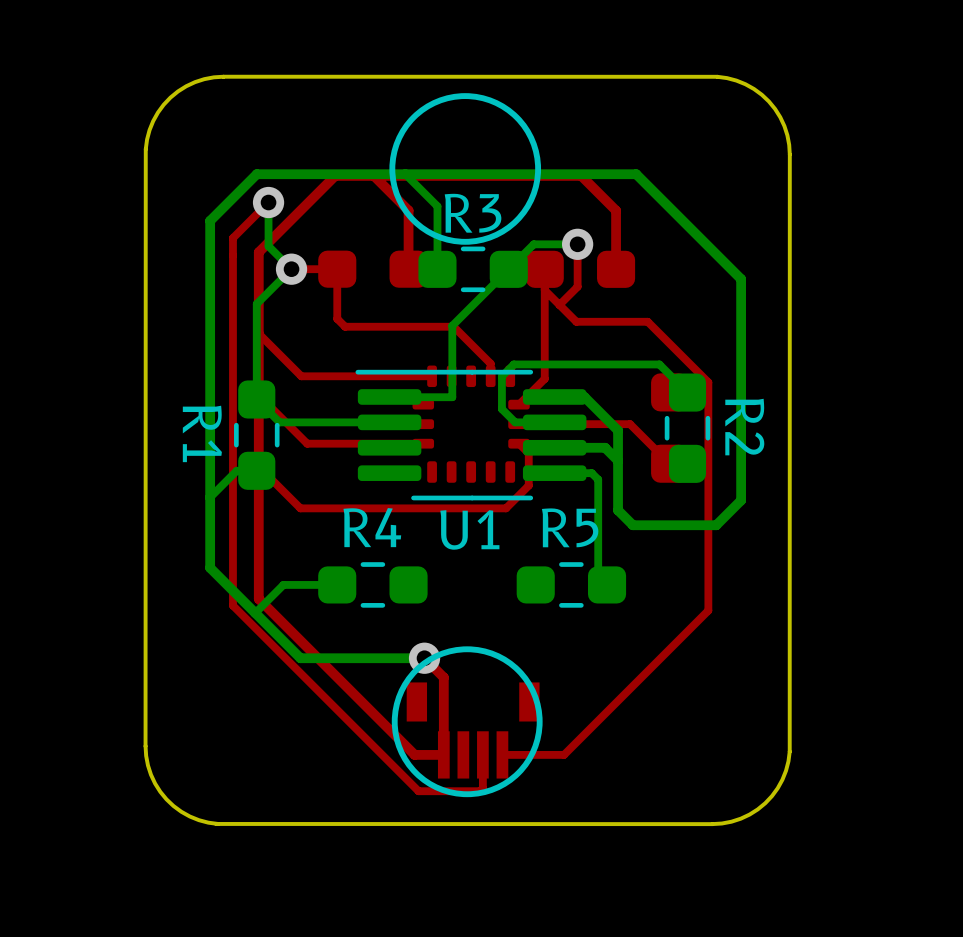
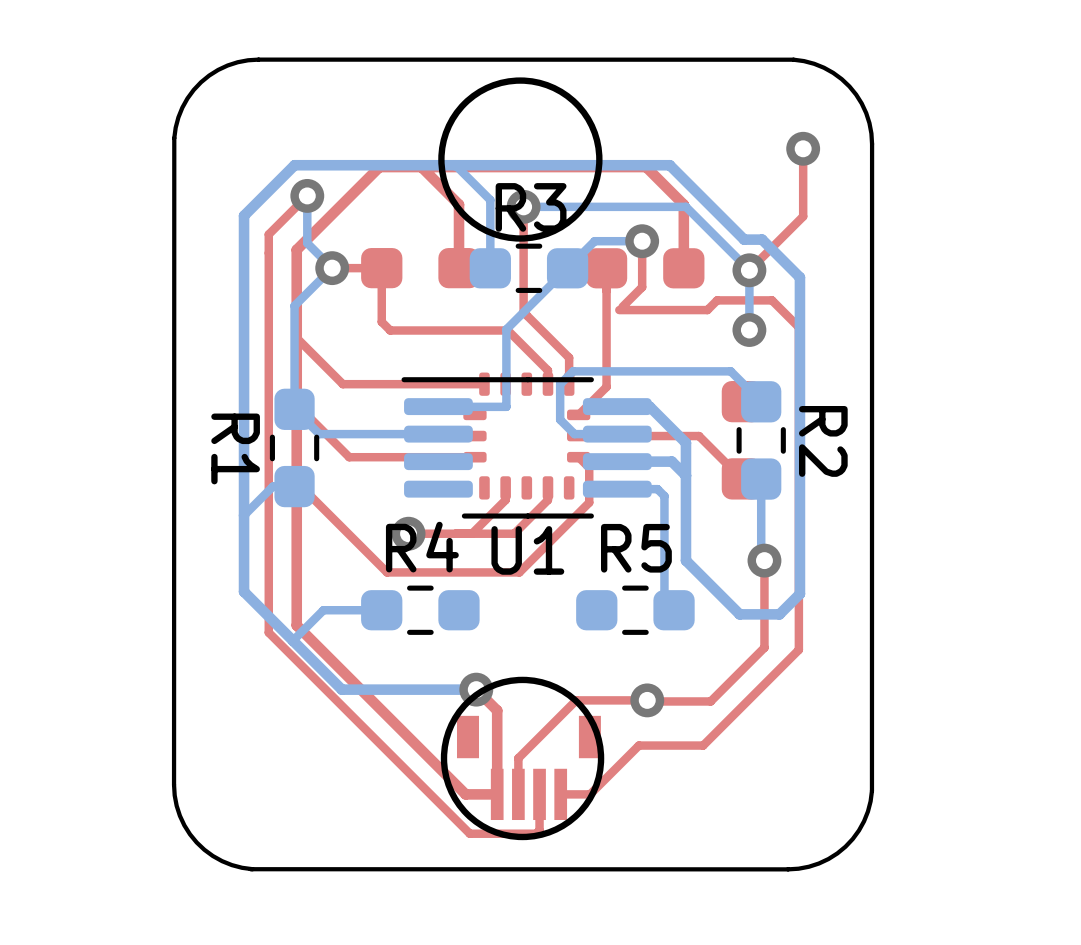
top track: none -> (803, 148) (803, 216) (749, 270)
via: none -> (803, 148)
bottom track: (603, 174) (636, 174) (741, 279) (741, 500) (716, 525) (632, 525) (618, 510) -> (669, 165) (744, 239) (762, 239) (799, 277) (799, 593) (779, 614) (739, 614) (685, 560) (685, 529)
top track: none -> (523, 206) (523, 312) (569, 357) (569, 384)
bottom track: none -> (523, 206) (685, 206) (749, 270) (749, 330)
via: none -> (523, 206)
via: none -> (749, 270)
top track: (544, 290) (576, 321) (647, 321) (708, 382) (708, 610) (564, 754) (529, 754) -> (619, 310) (707, 310) (717, 300) (771, 300) (798, 327) (798, 649) (703, 745) (638, 745) (590, 794)
via: none -> (749, 330)
bottom track: none -> (761, 479) (761, 557) (764, 560)
top track: none -> (505, 487) (505, 500) (471, 533)
top track: none -> (547, 487) (547, 500) (514, 533) (408, 533)
top track: (506, 508) (300, 508) -> (564, 527) (519, 572) (387, 572) (341, 527)
via: none -> (408, 533)
top track: none -> (764, 560) (764, 647) (710, 701) (576, 700) (518, 758) (518, 794)
via: none -> (764, 560)
via: none -> (647, 700)

